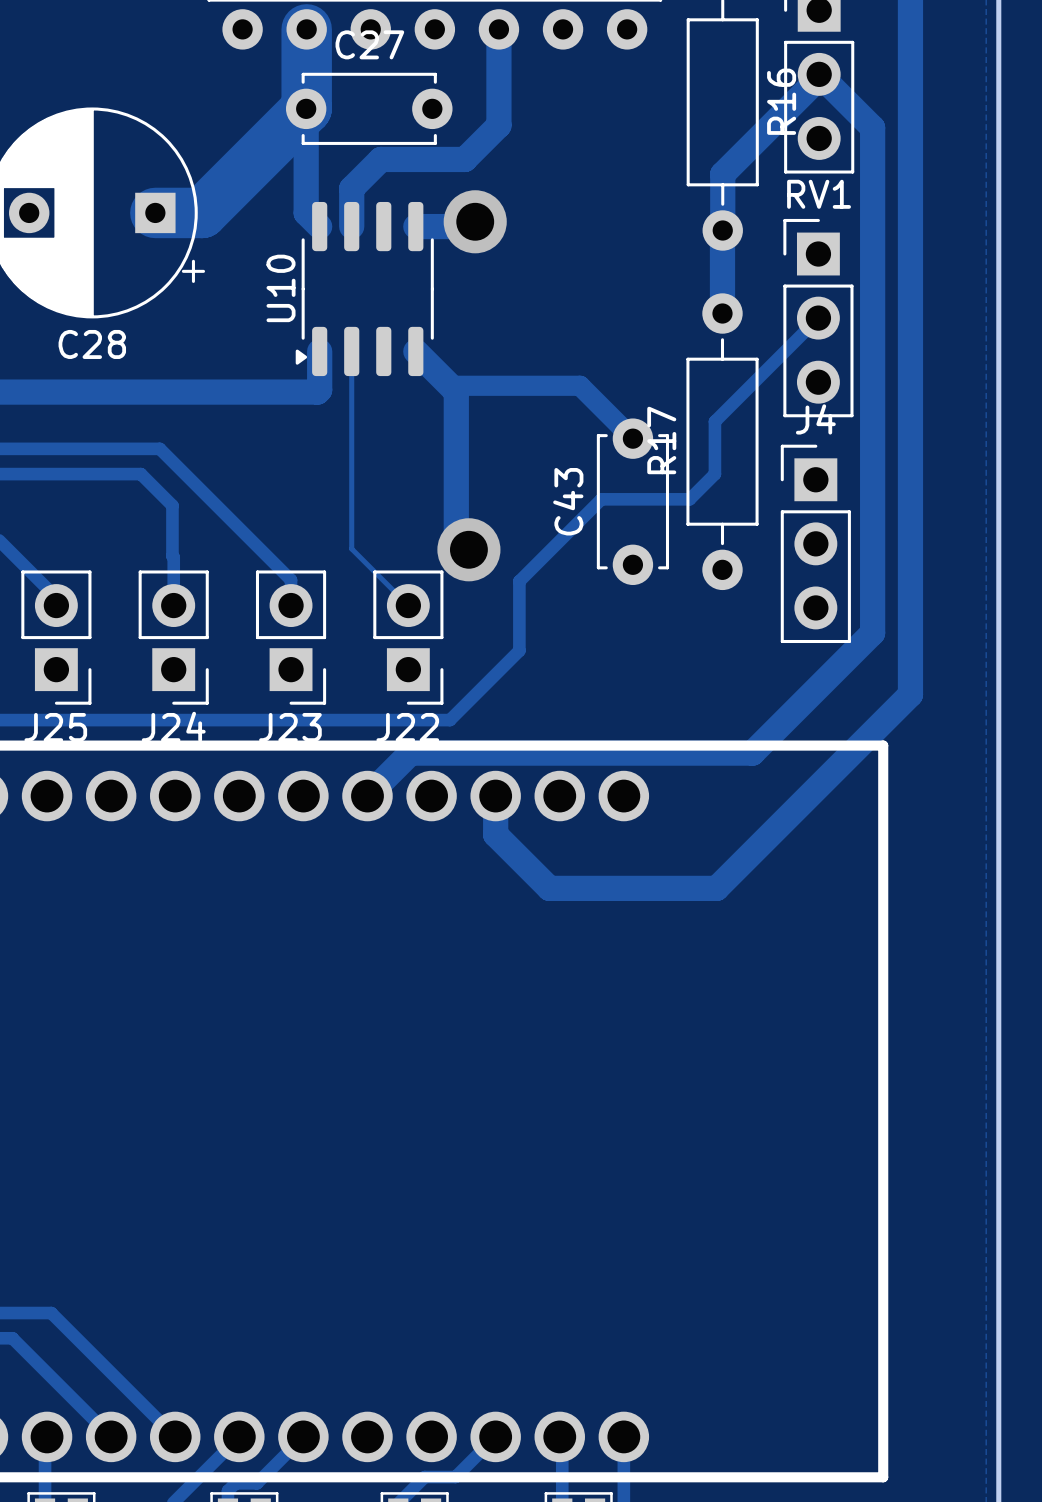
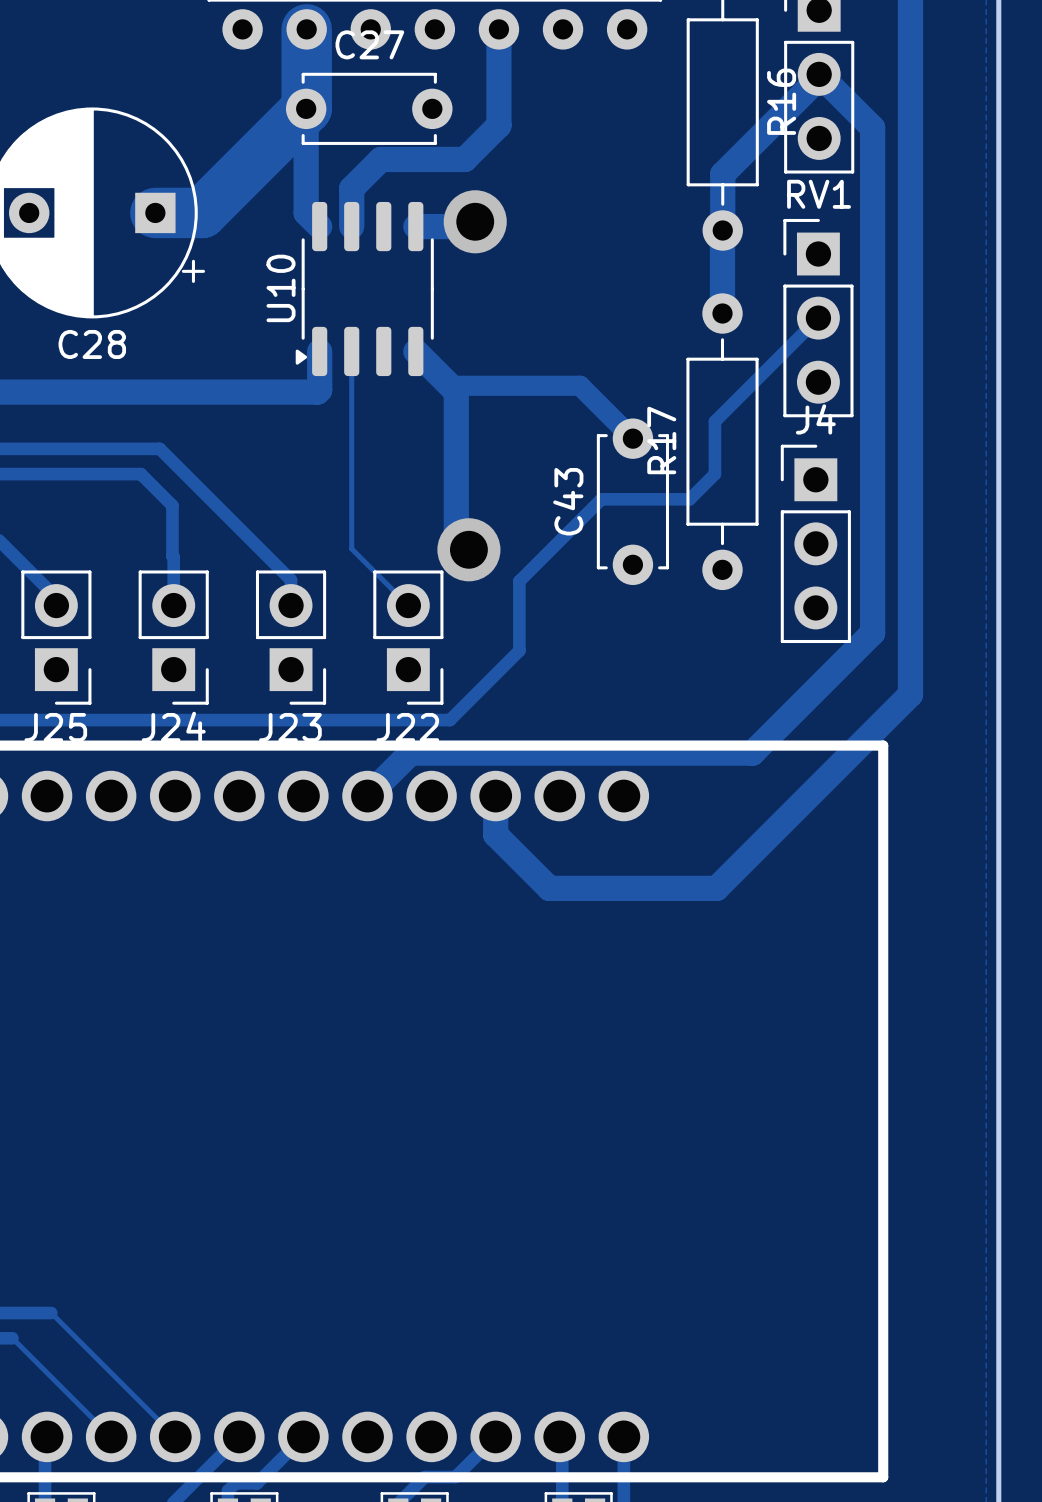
track width: thick (51, 1313) (175, 1436) -> thin (51, 1313) (175, 1436)
track width: thick (12, 1338) (111, 1436) -> thin (12, 1338) (111, 1436)

